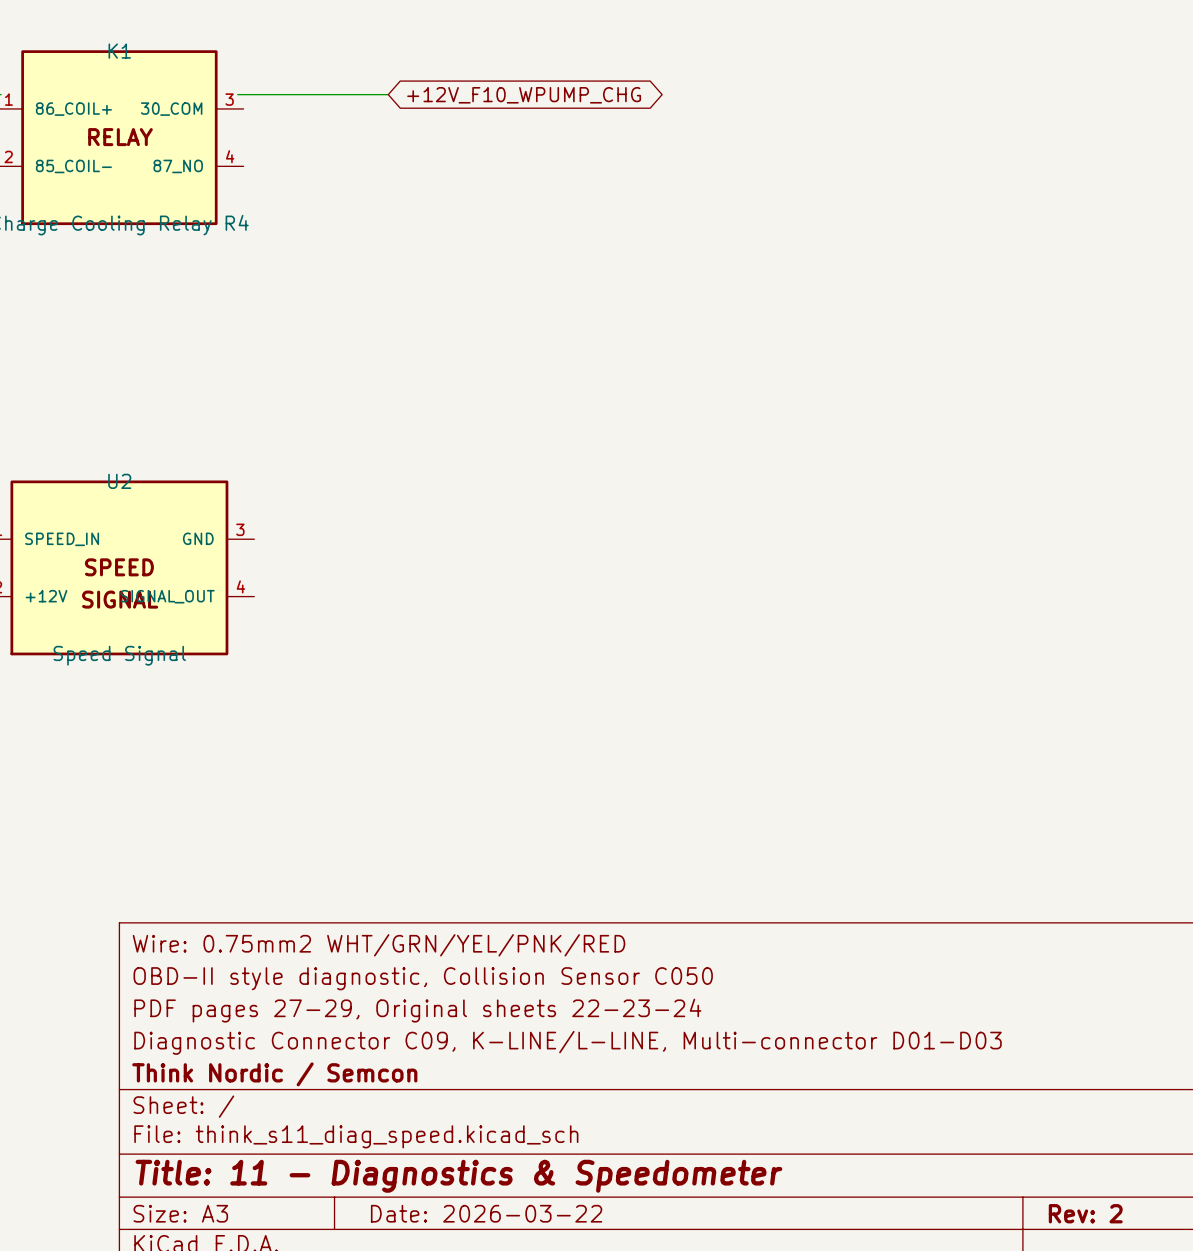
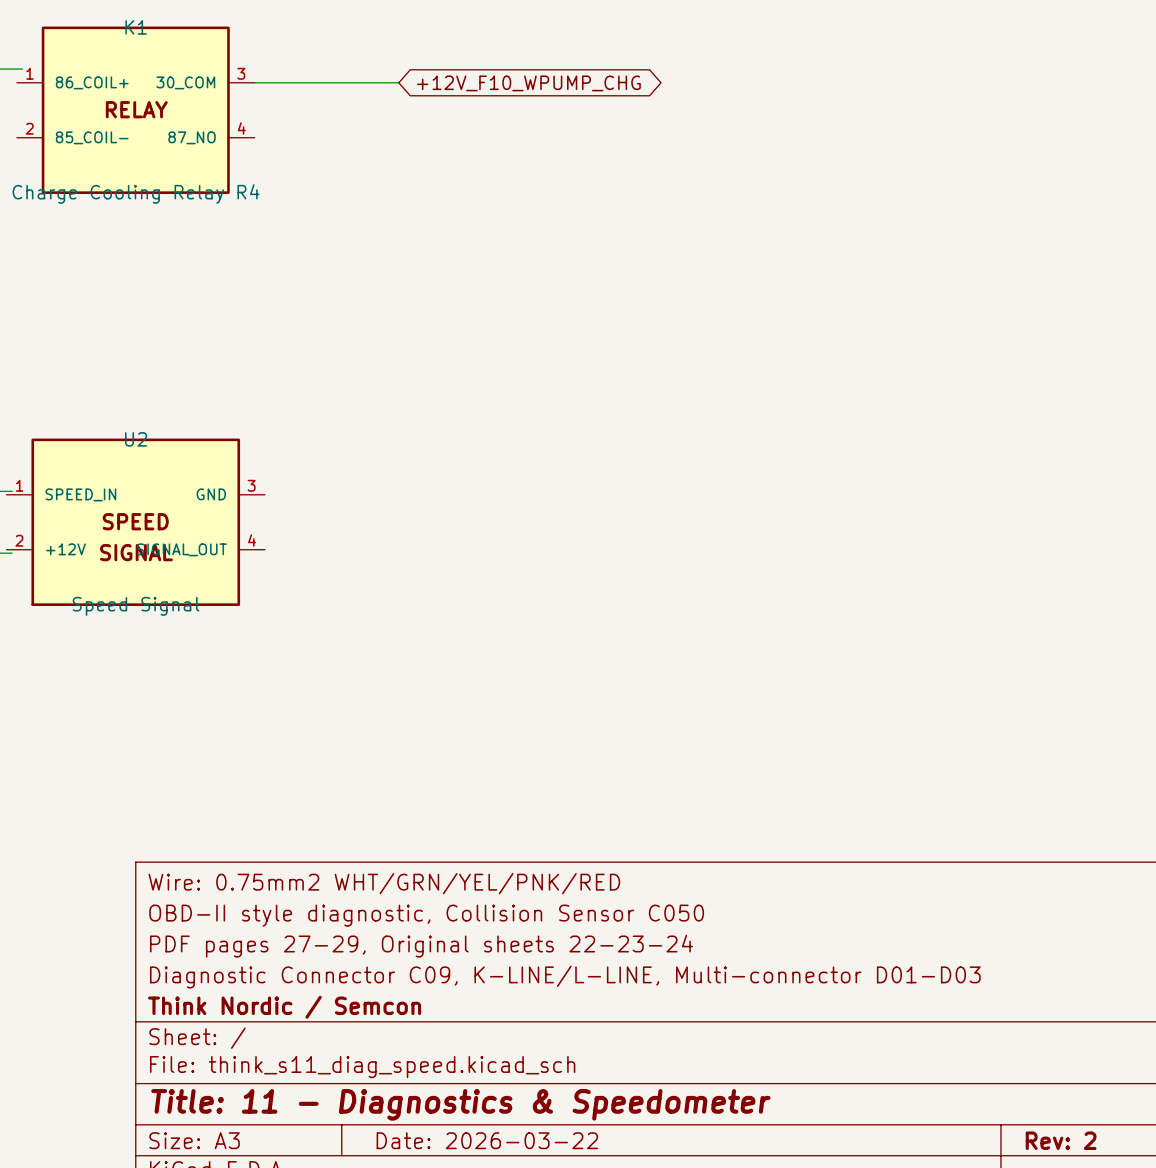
wire: (237, 94) (388, 94) -> (254, 82) (398, 82)
global label position: +12V_F10_WPUMP_CHG (524, 95) -> +12V_F10_WPUMP_CHG (528, 83)

